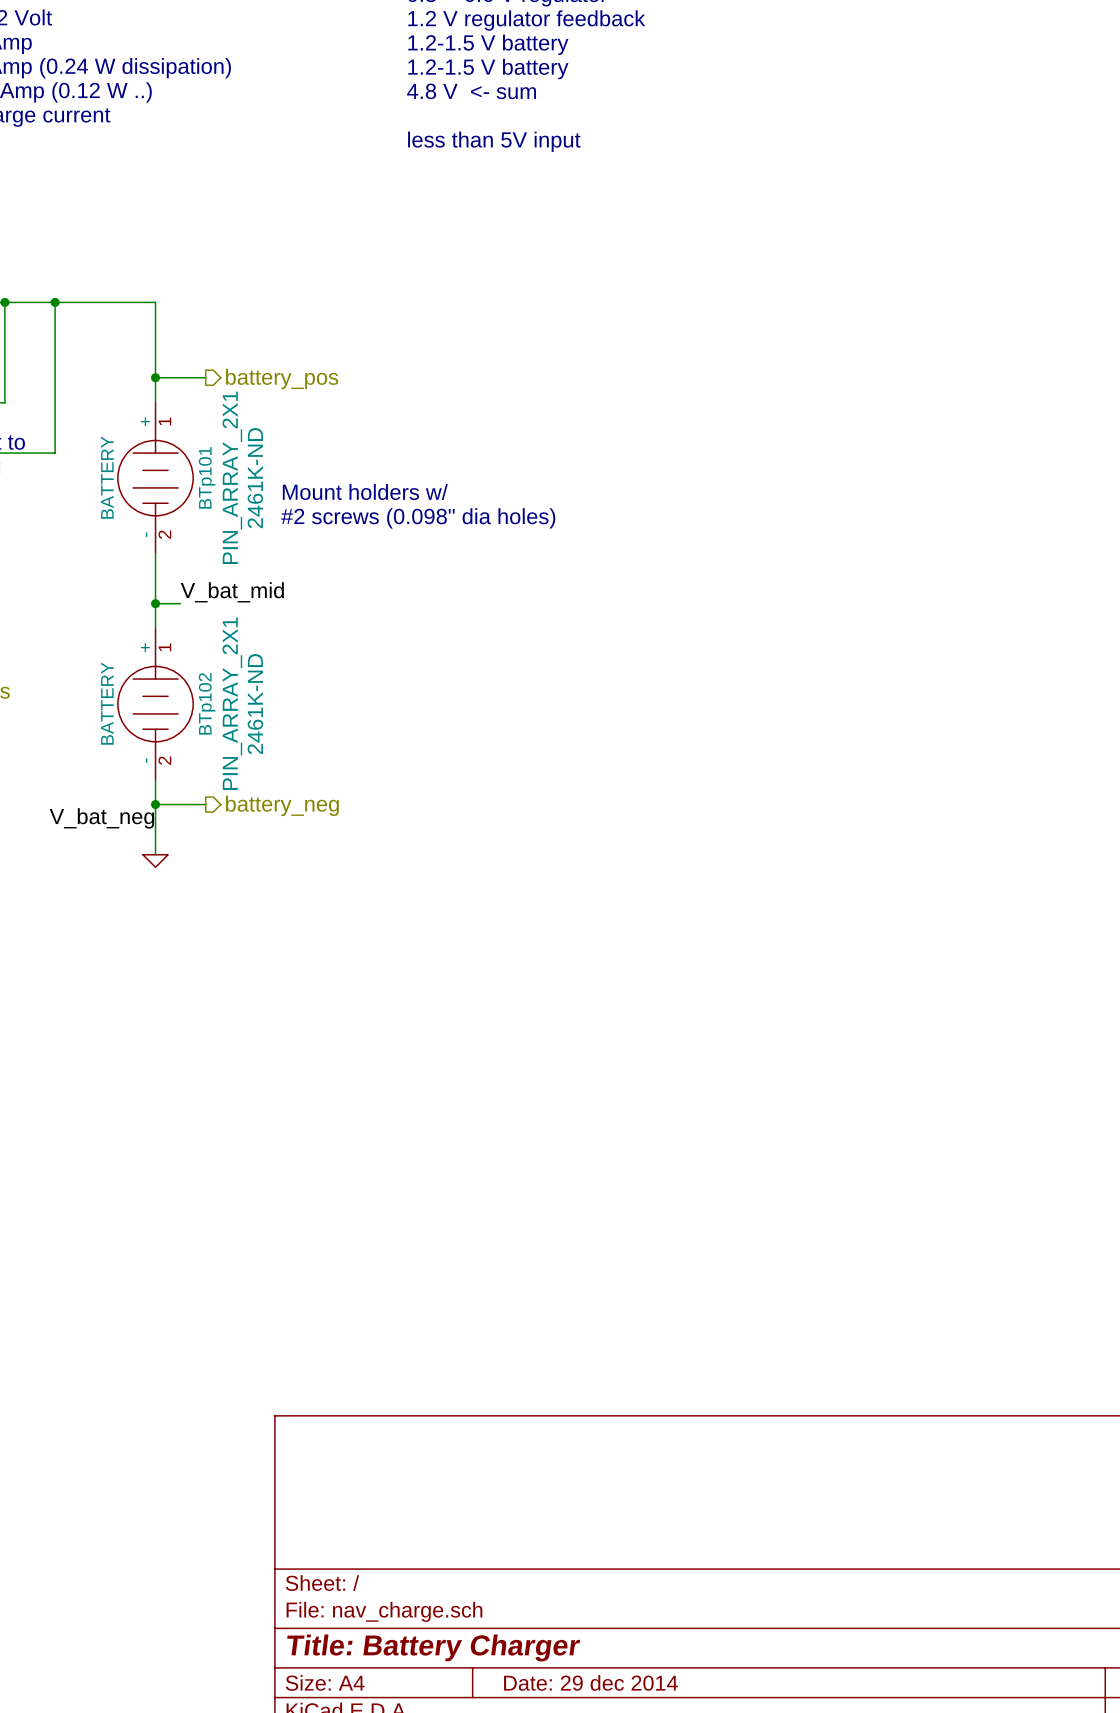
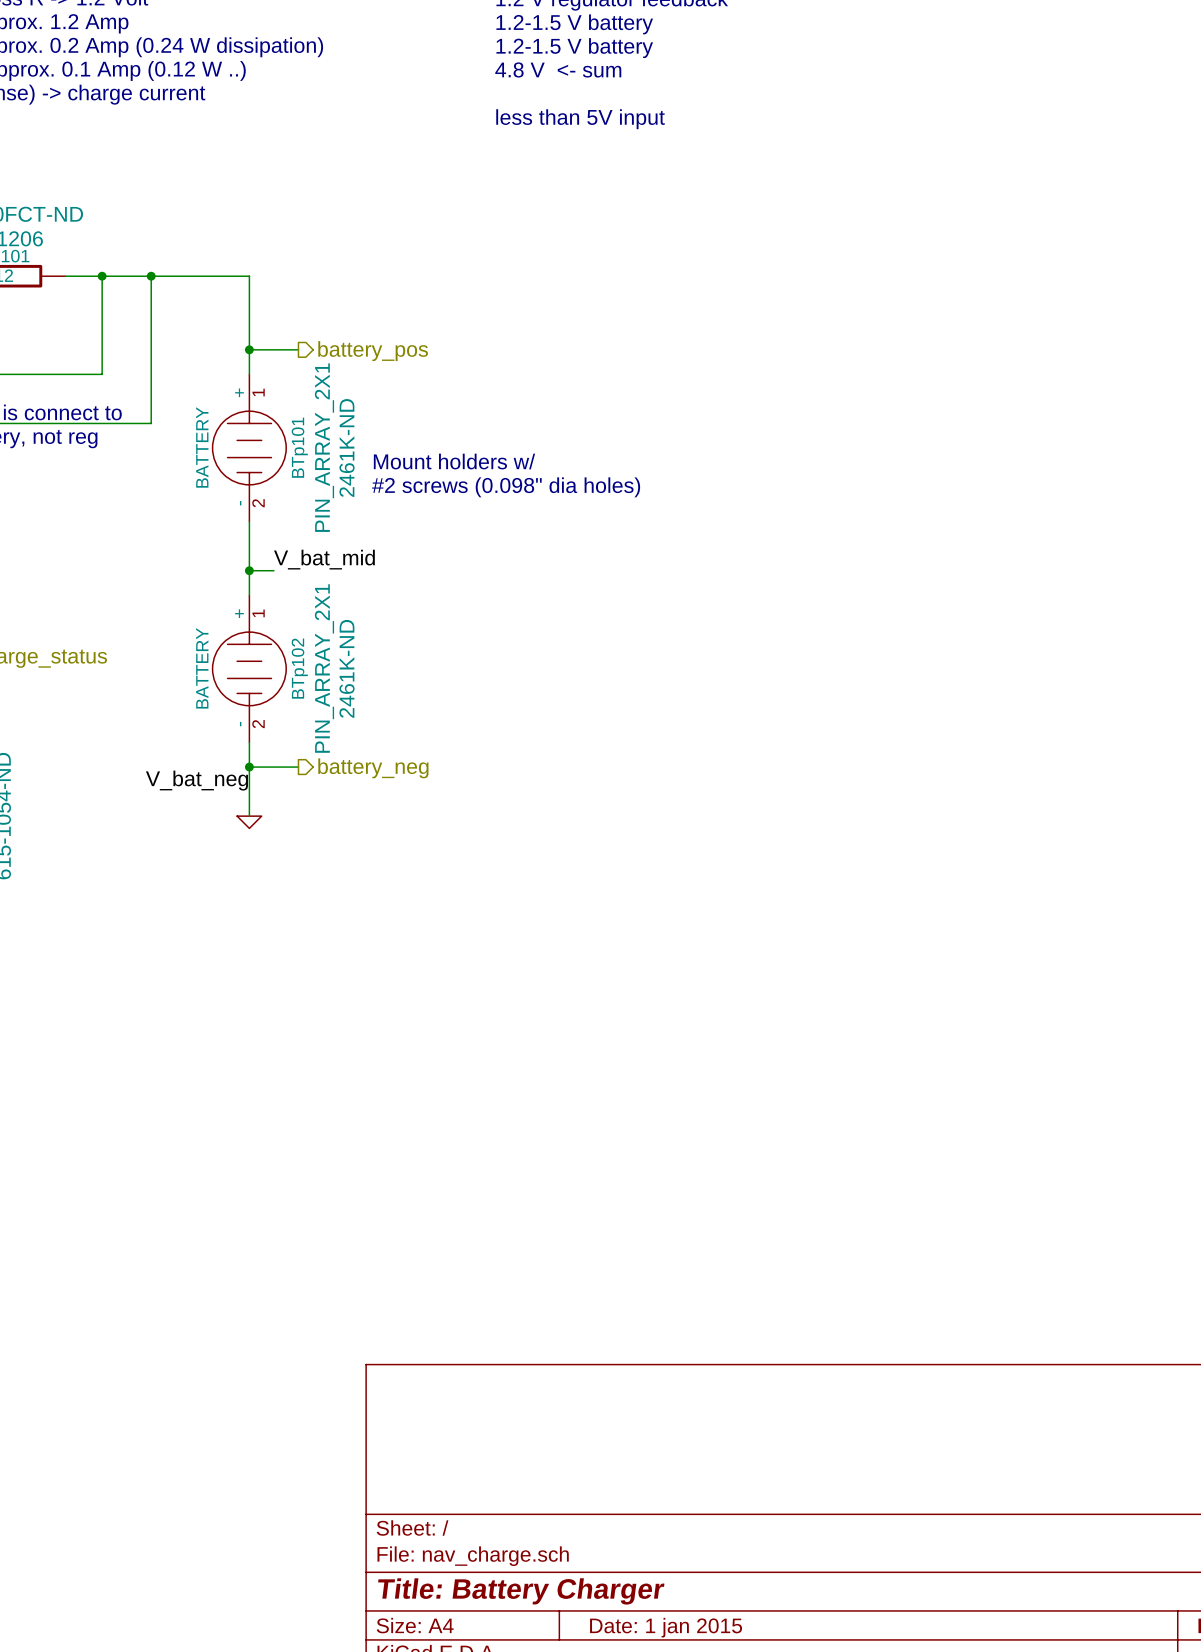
title block: Date: 29 dec 2014 (590, 1682) -> Date: 1 jan 2015 (666, 1627)

